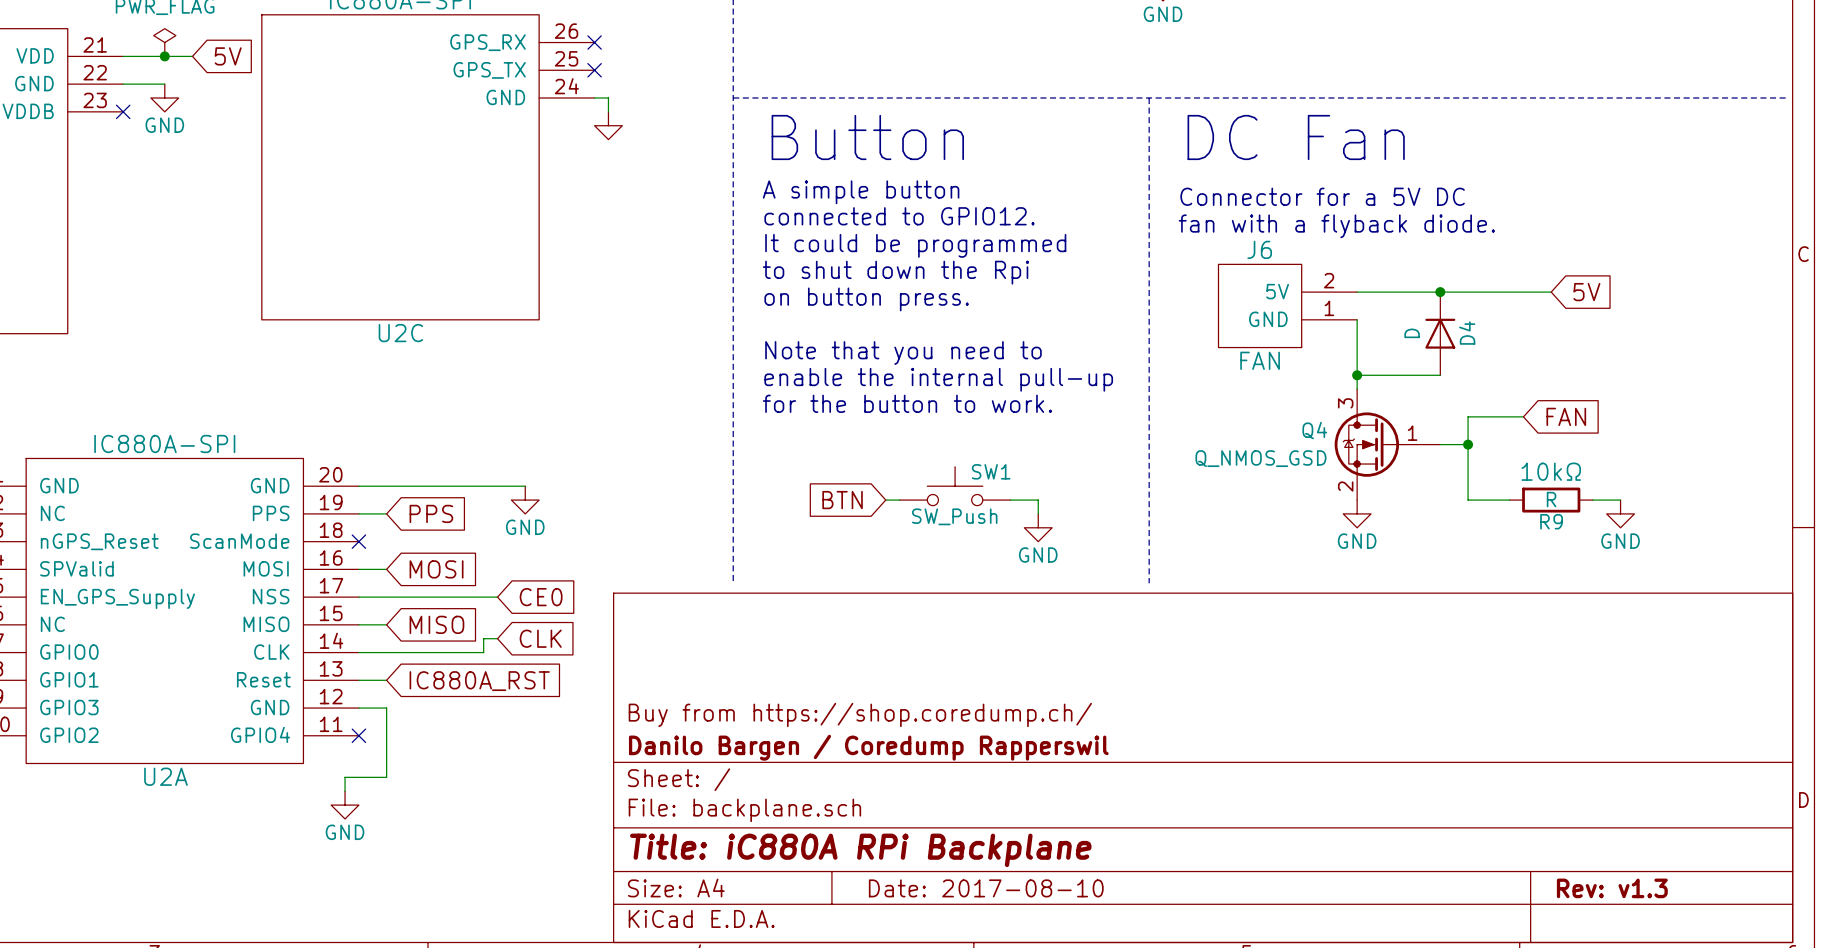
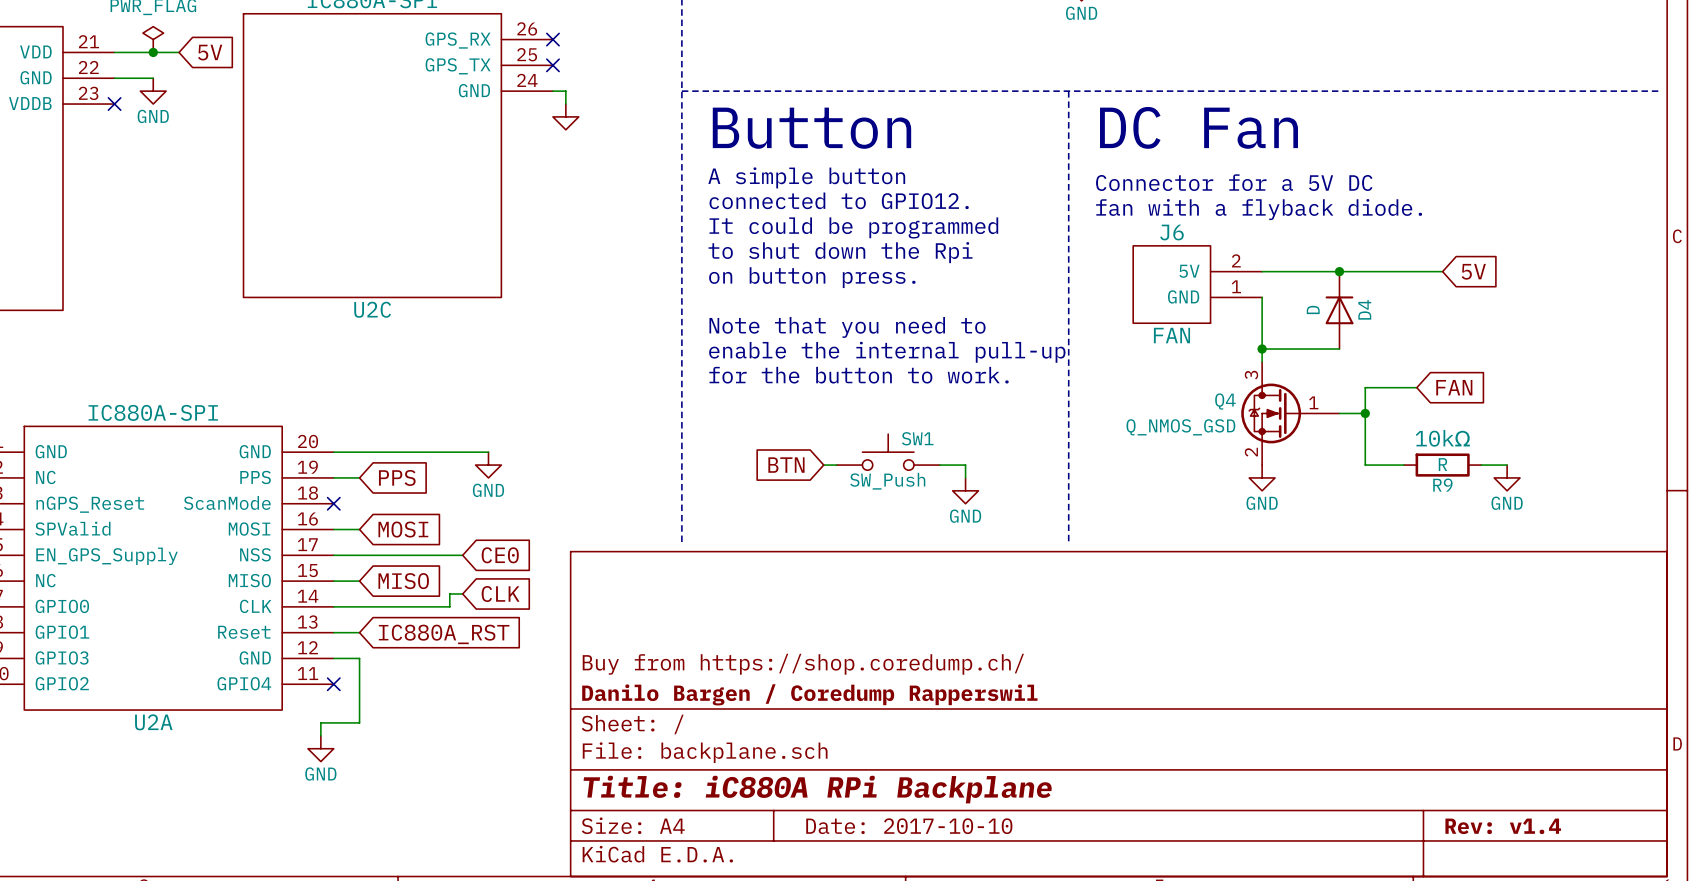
title block: Date: 2017-08-10 (986, 888) -> Date: 2017-10-10 (909, 826)
title block: Rev: v1.3 (1612, 888) -> Rev: v1.4 (1503, 826)

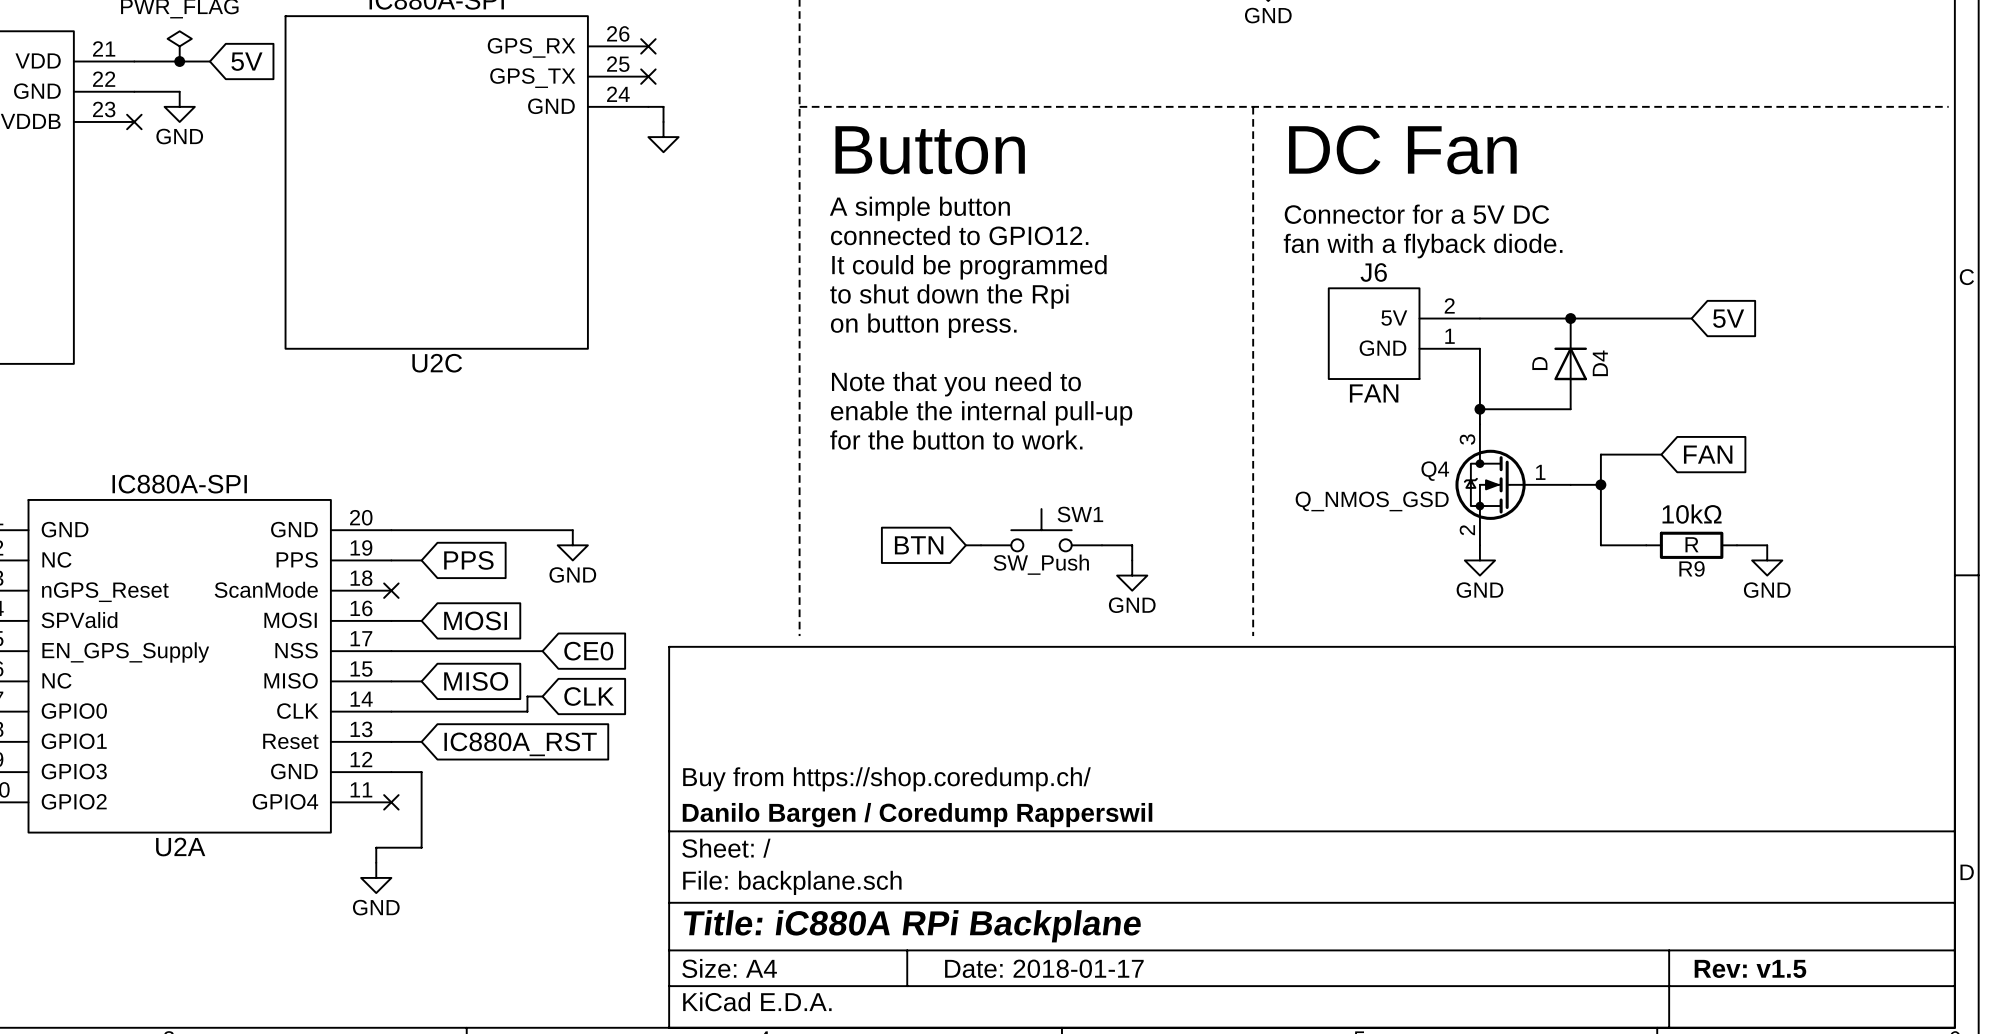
title block: Date: 2017-10-10 (909, 826) -> Date: 2018-01-17 (1044, 968)
title block: Rev: v1.4 (1503, 826) -> Rev: v1.5 (1750, 968)

